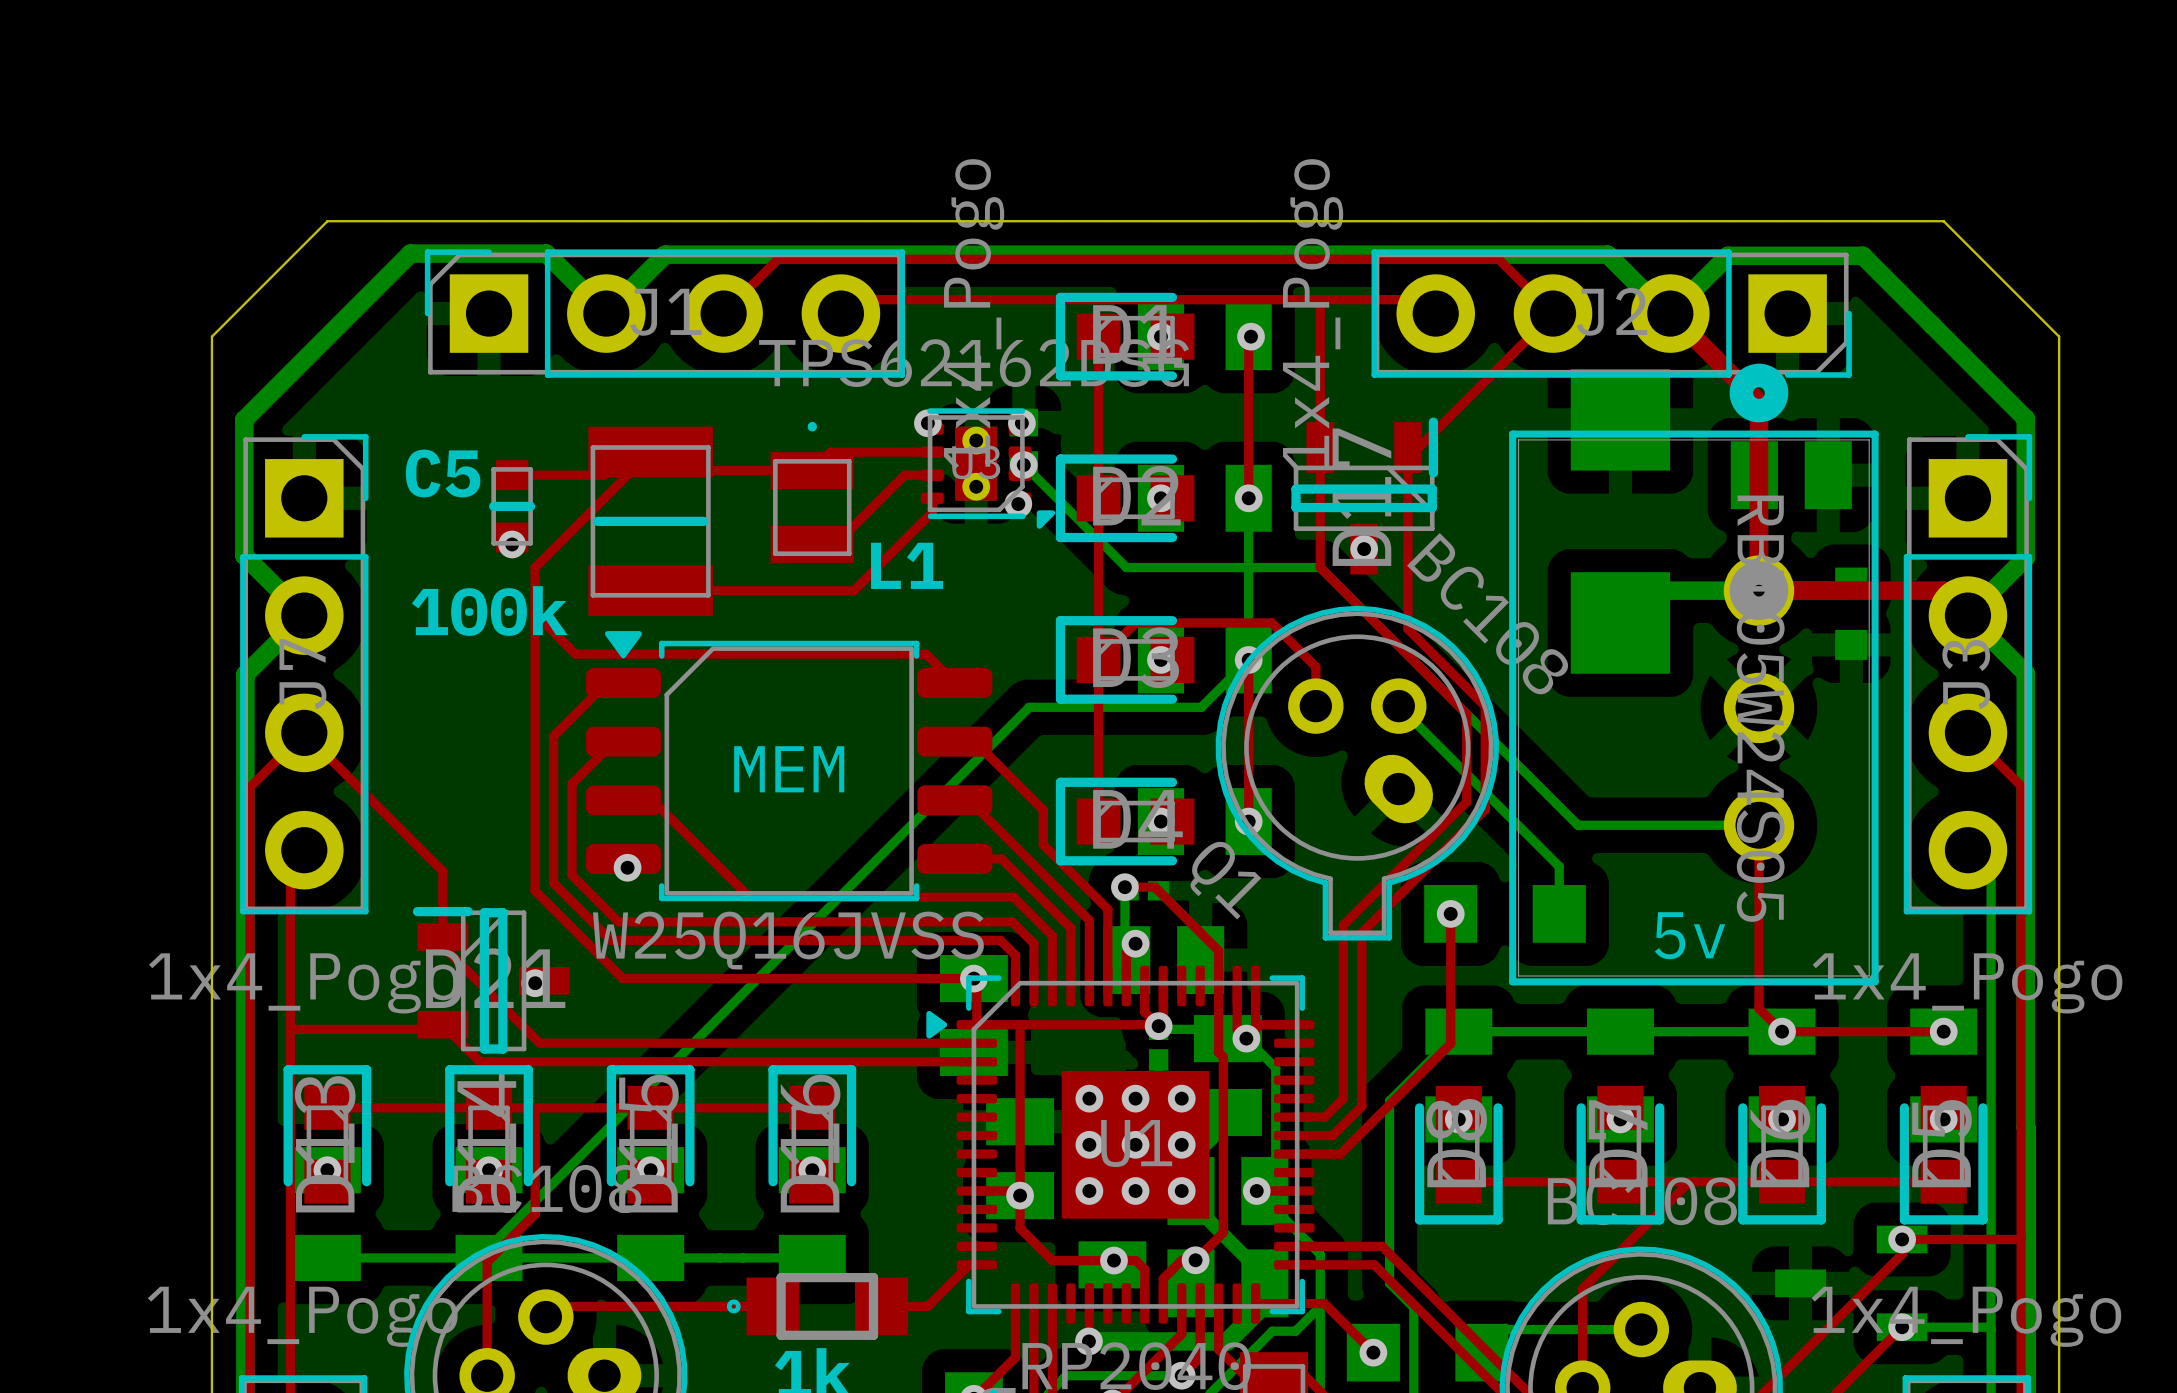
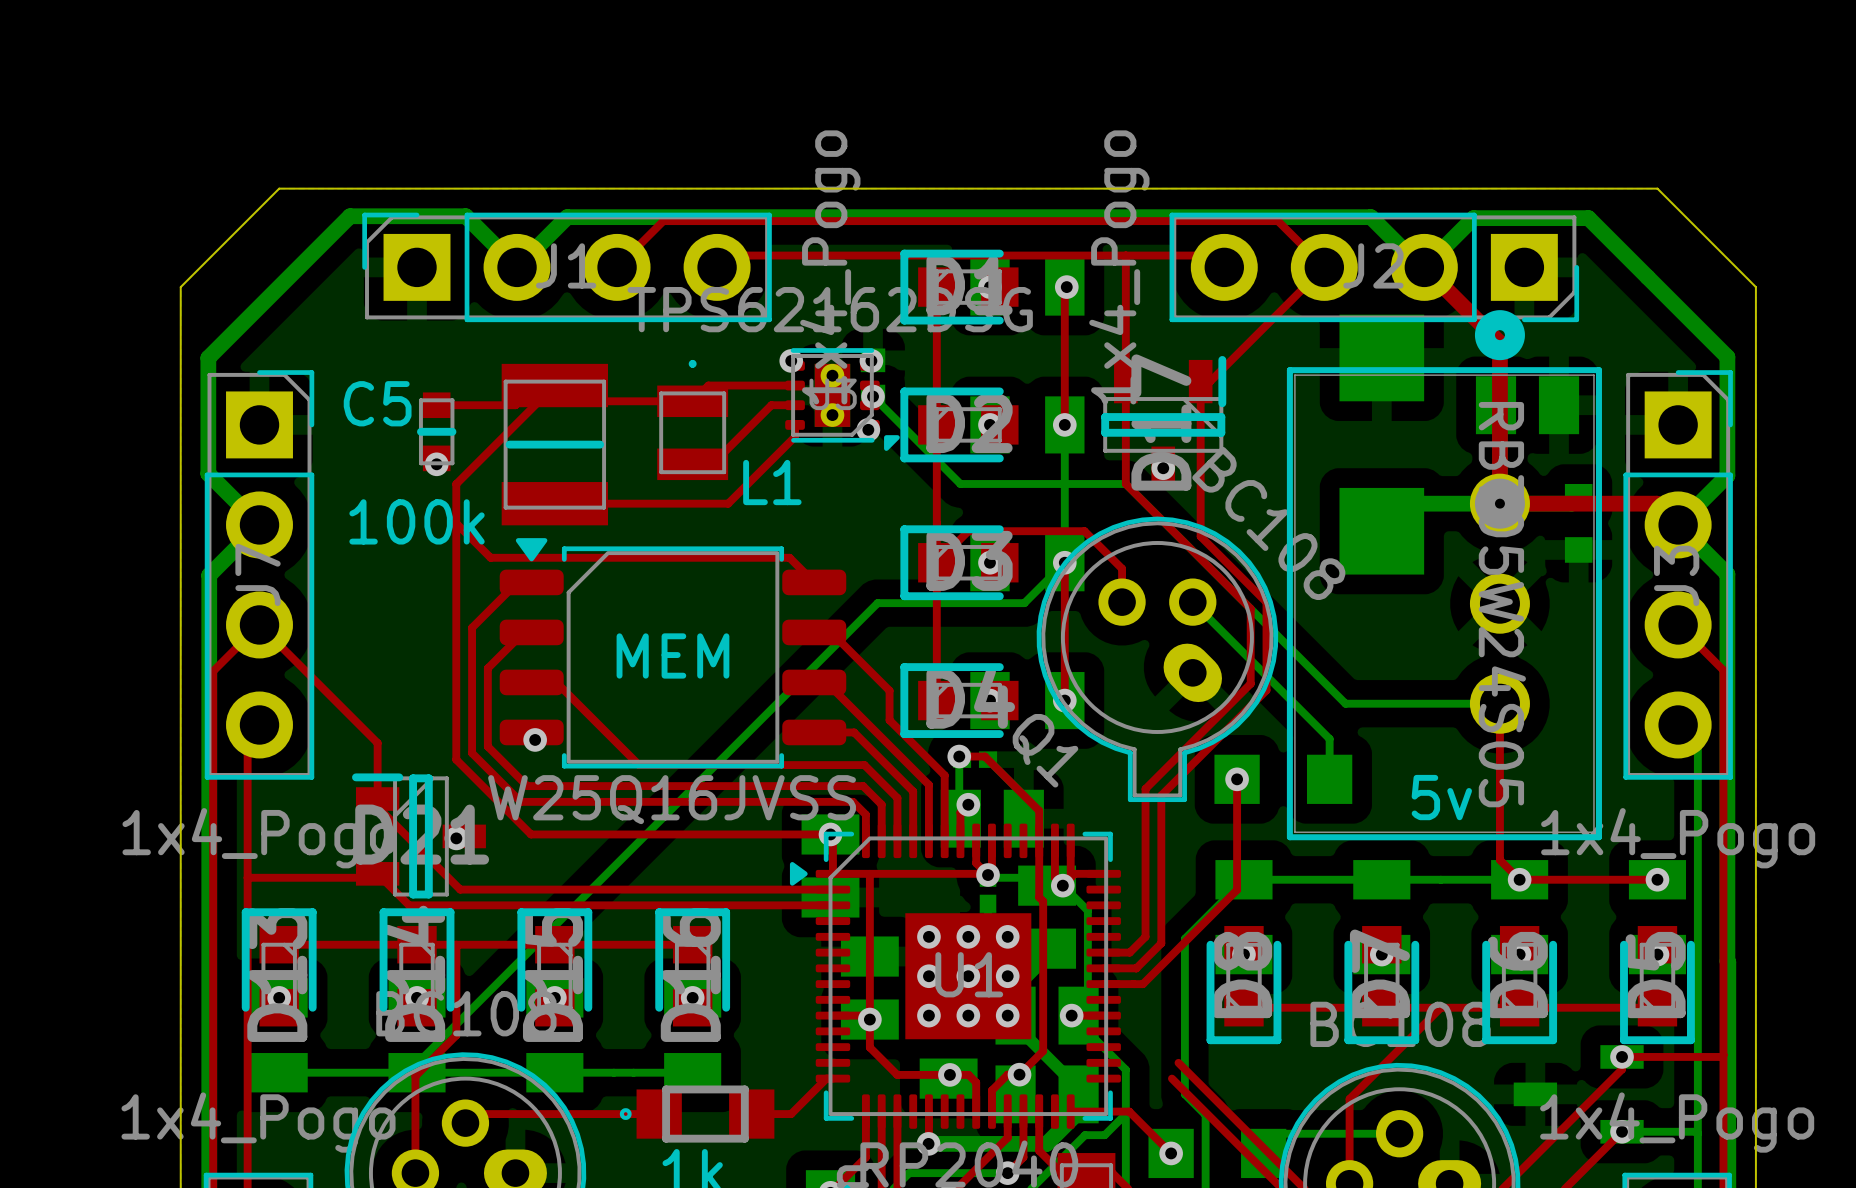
top track: (1294, 1246) (1382, 1246) -> none
top track: (1294, 1264) (1374, 1264) -> none

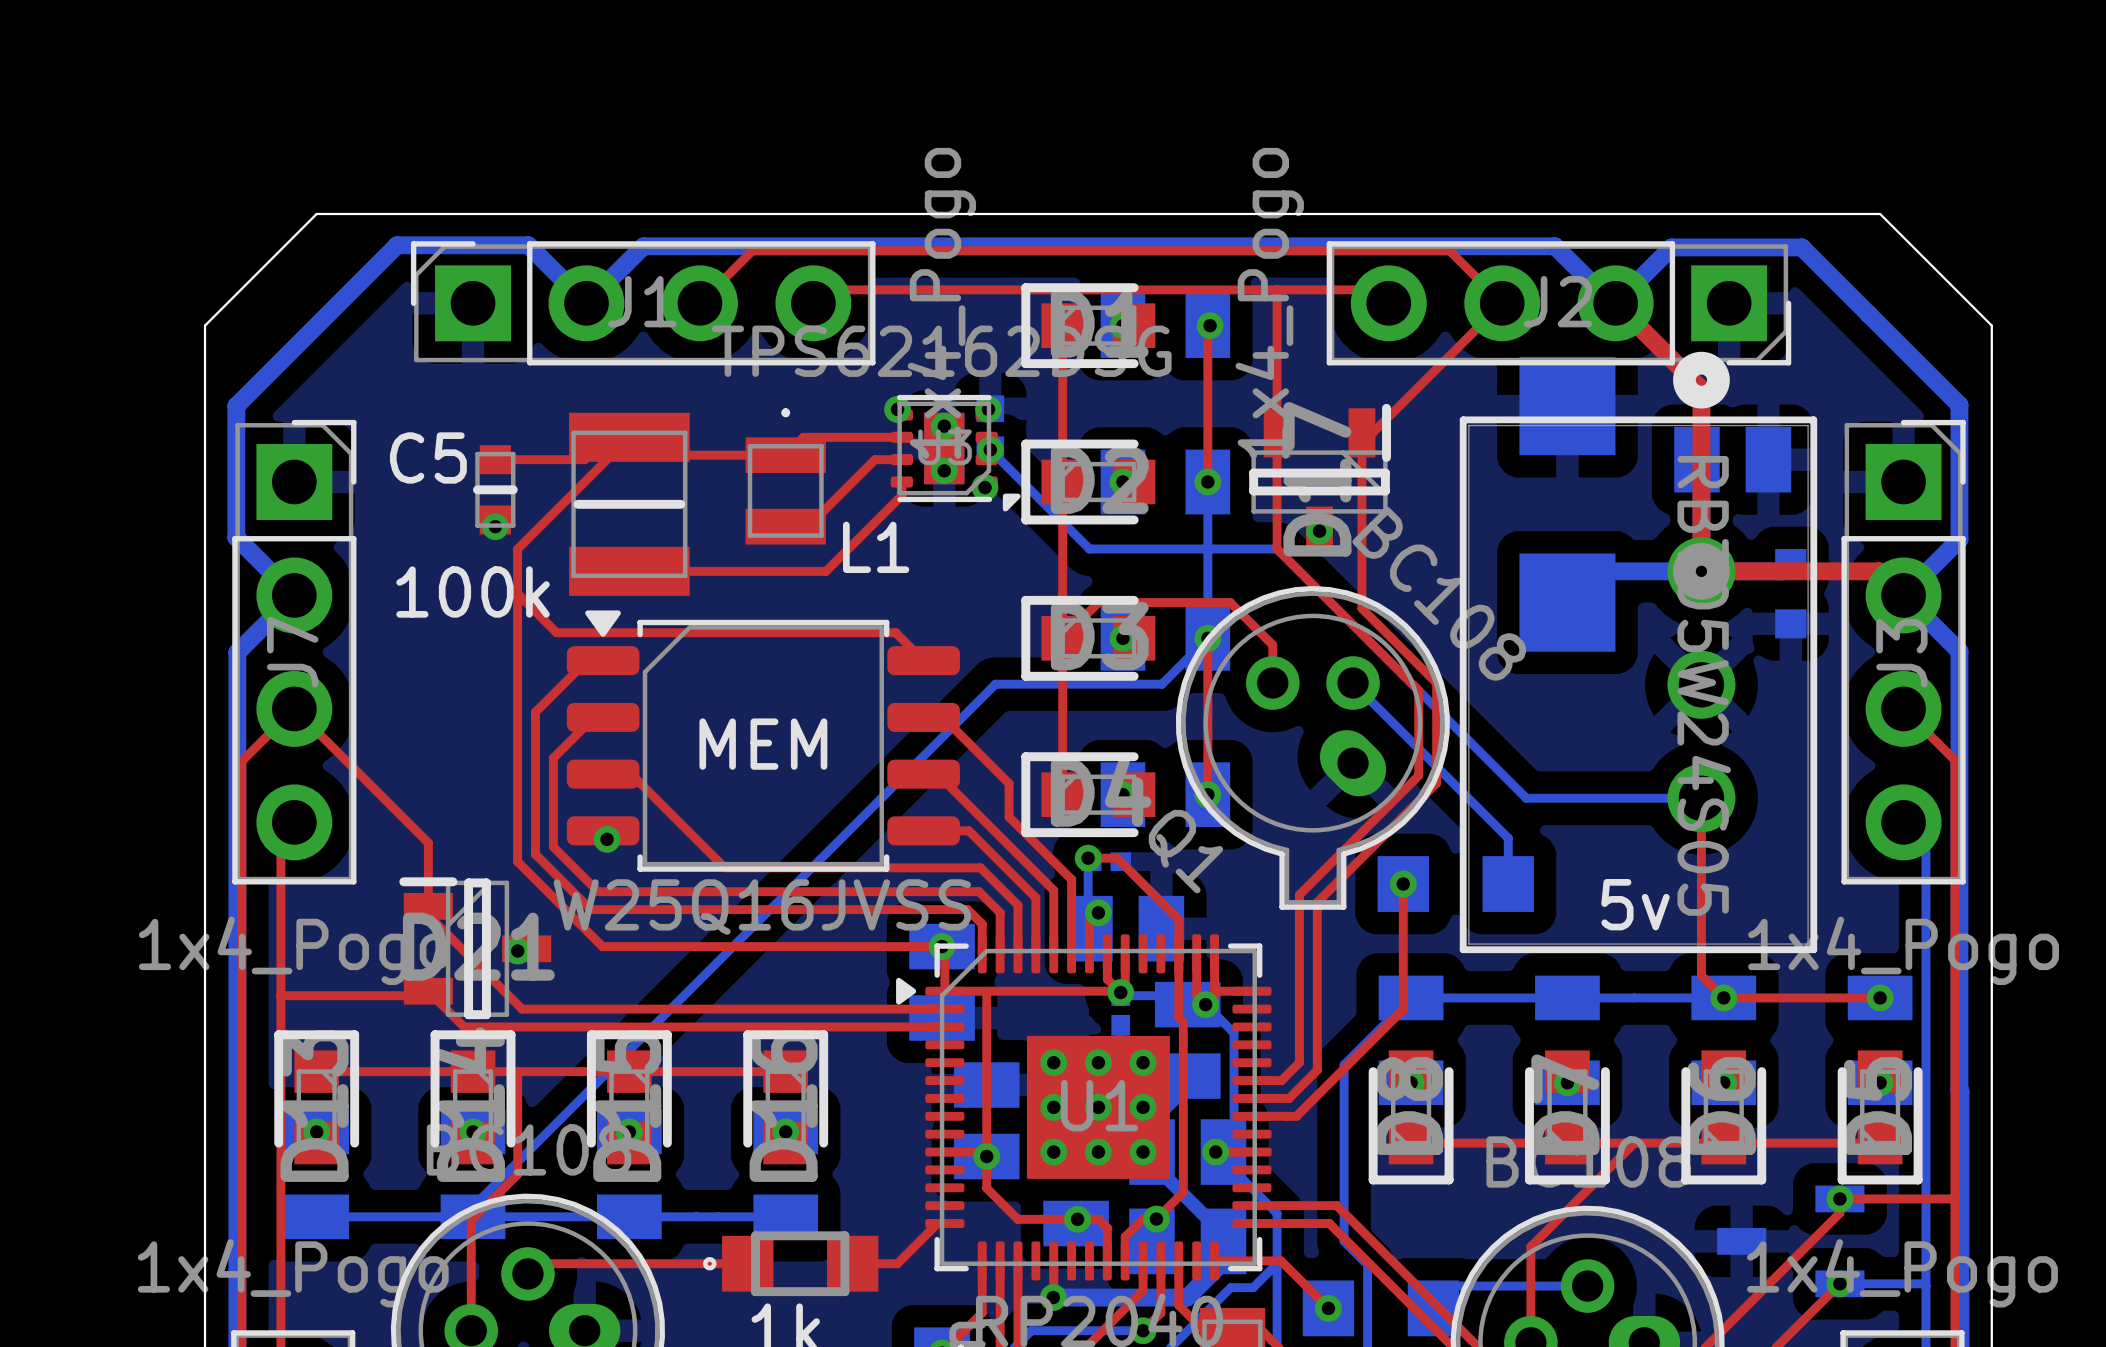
top track: none -> (1251, 1205) (1336, 1205)
top track: none -> (1251, 1223) (1329, 1223)

